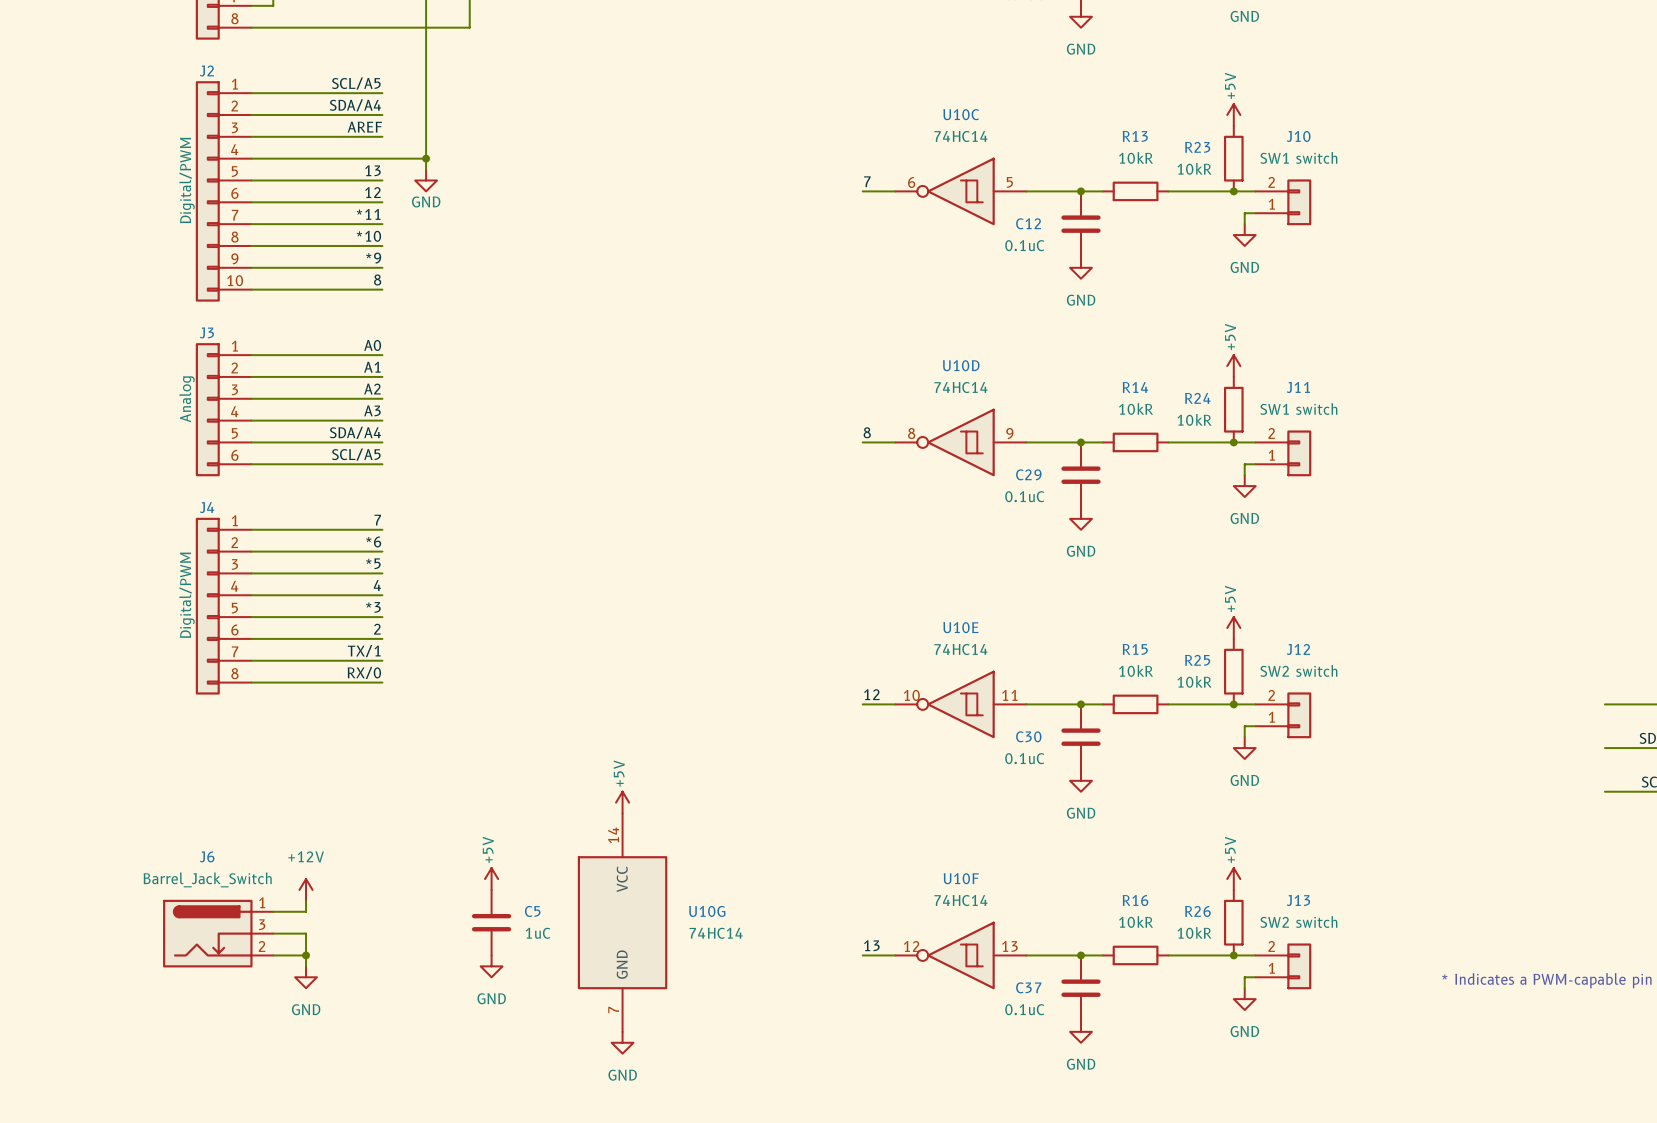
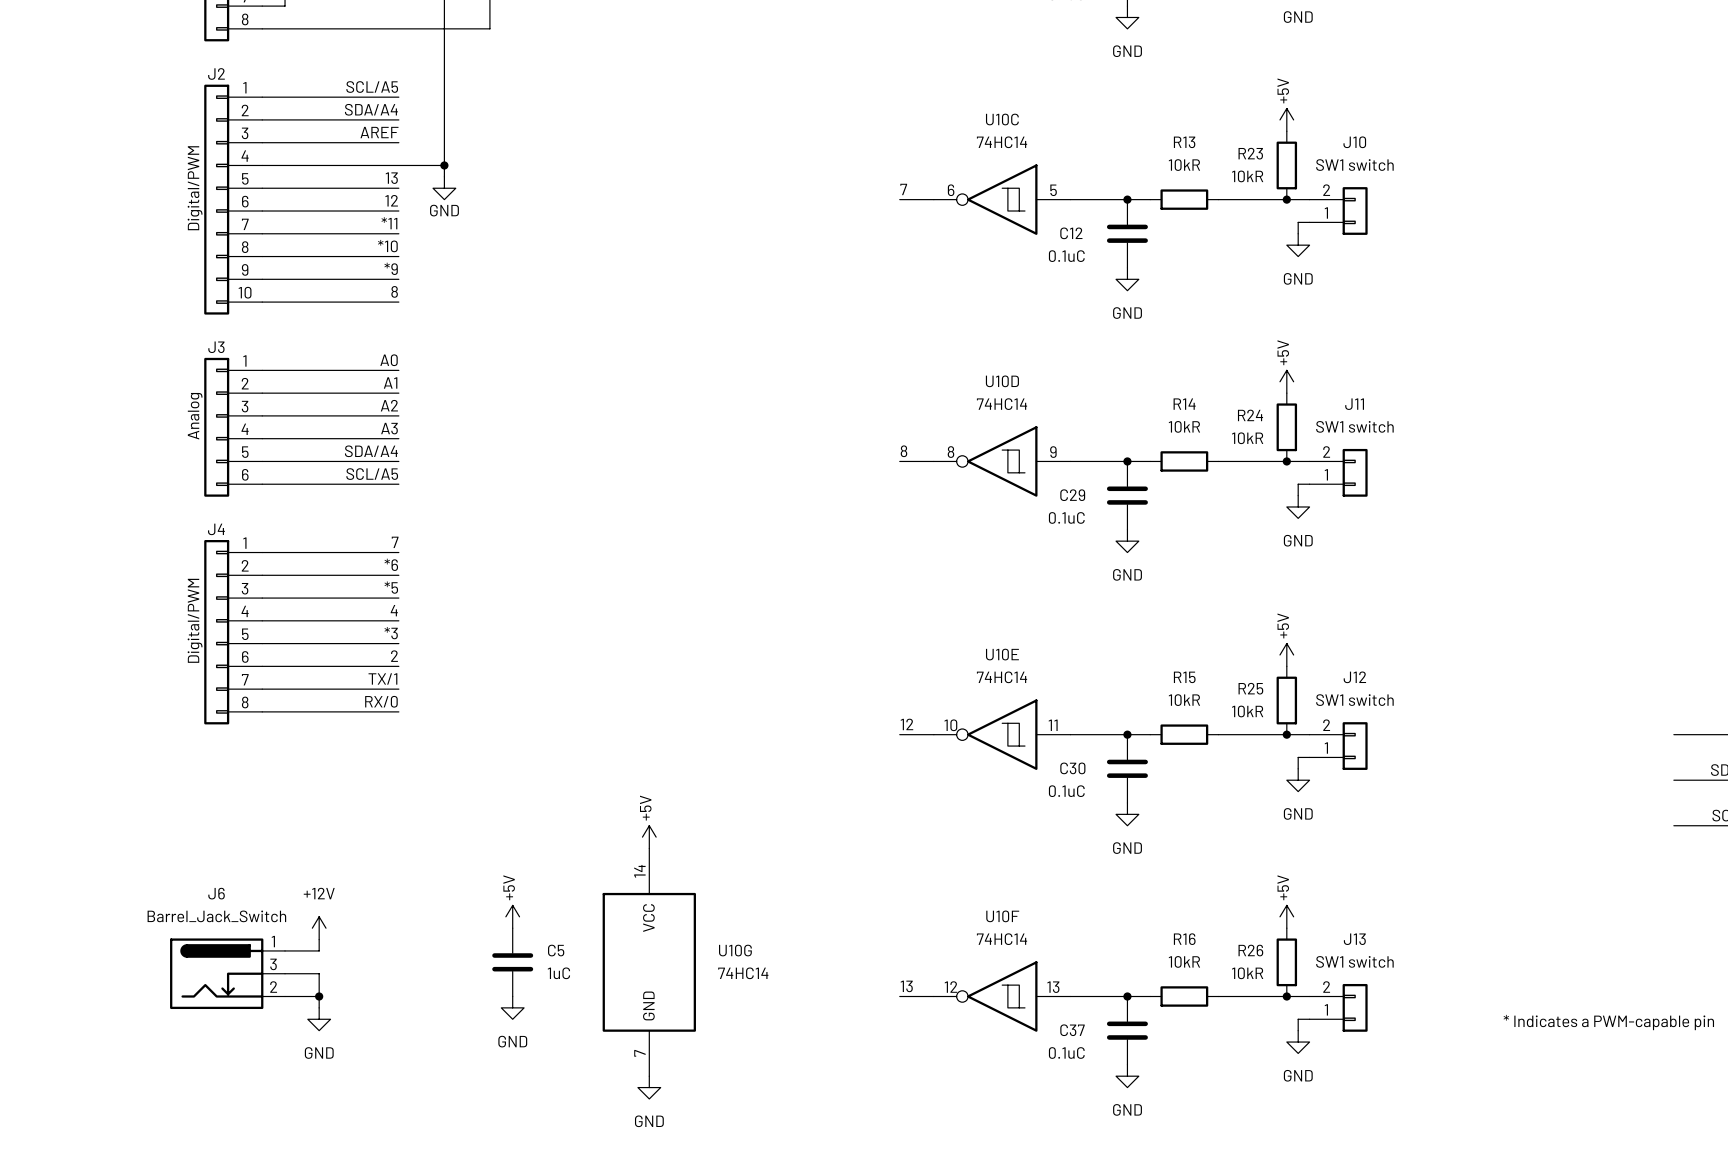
J12 value: SW2 switch (1298, 670) -> SW1 switch (1354, 700)
J13 value: SW2 switch (1298, 922) -> SW1 switch (1354, 961)

